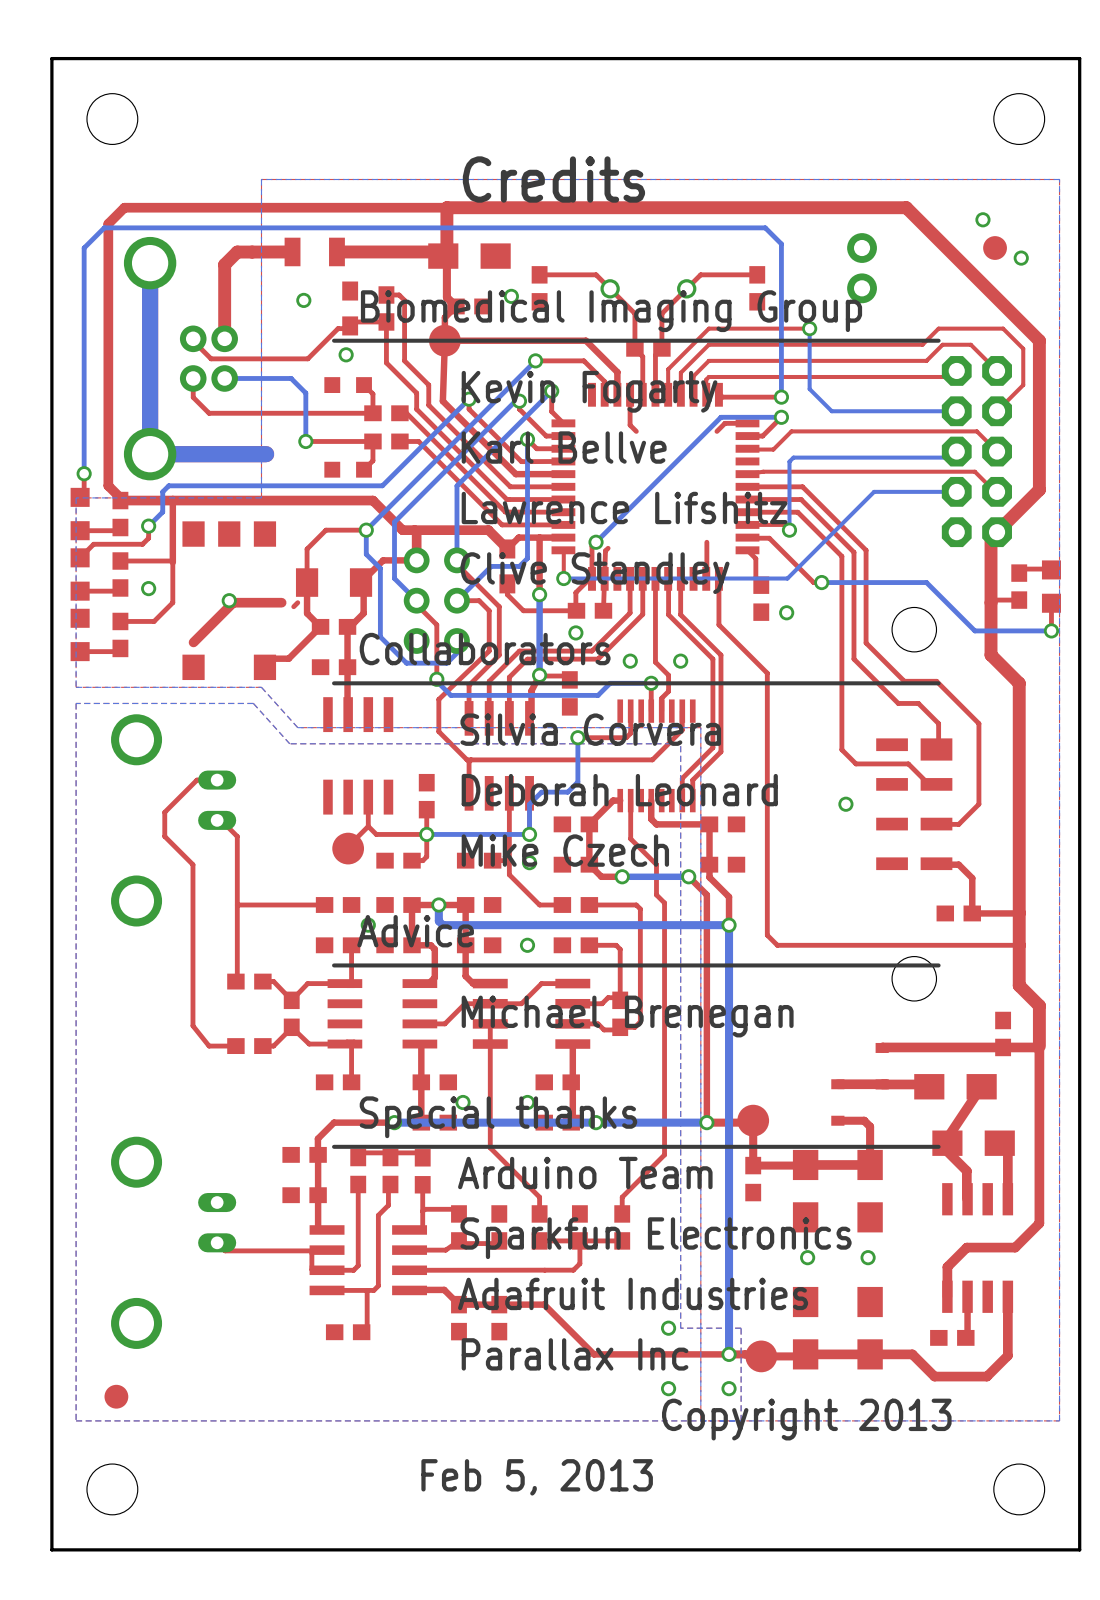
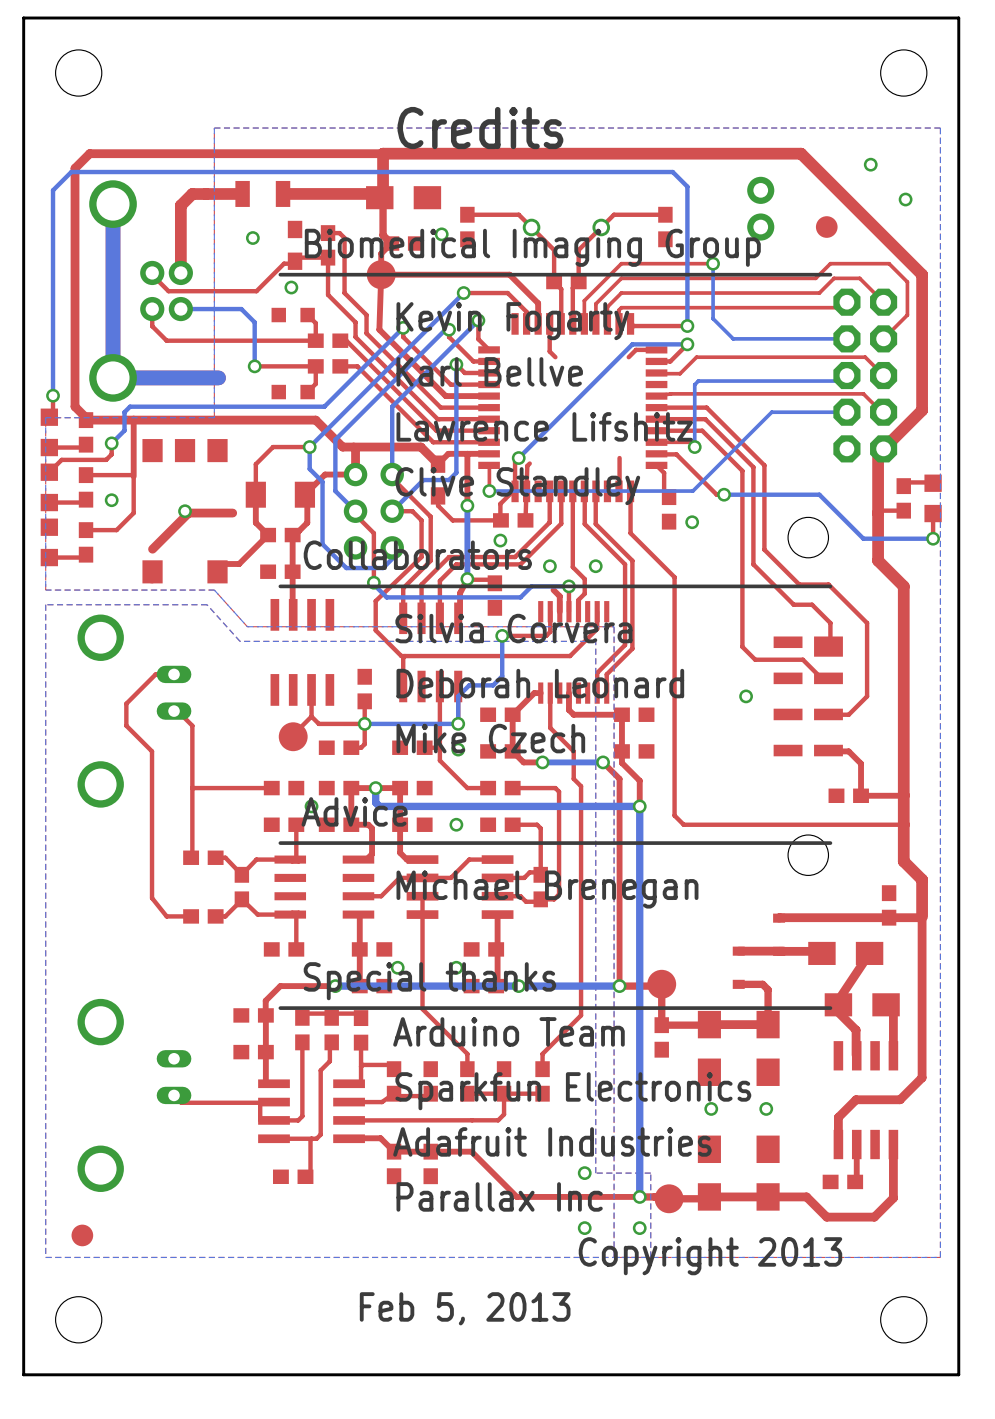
part position: (995, 248) -> (826, 227)
top track: (297, 602) (293, 606) -> none
top track: none -> (553, 590) (559, 596) (559, 611)

